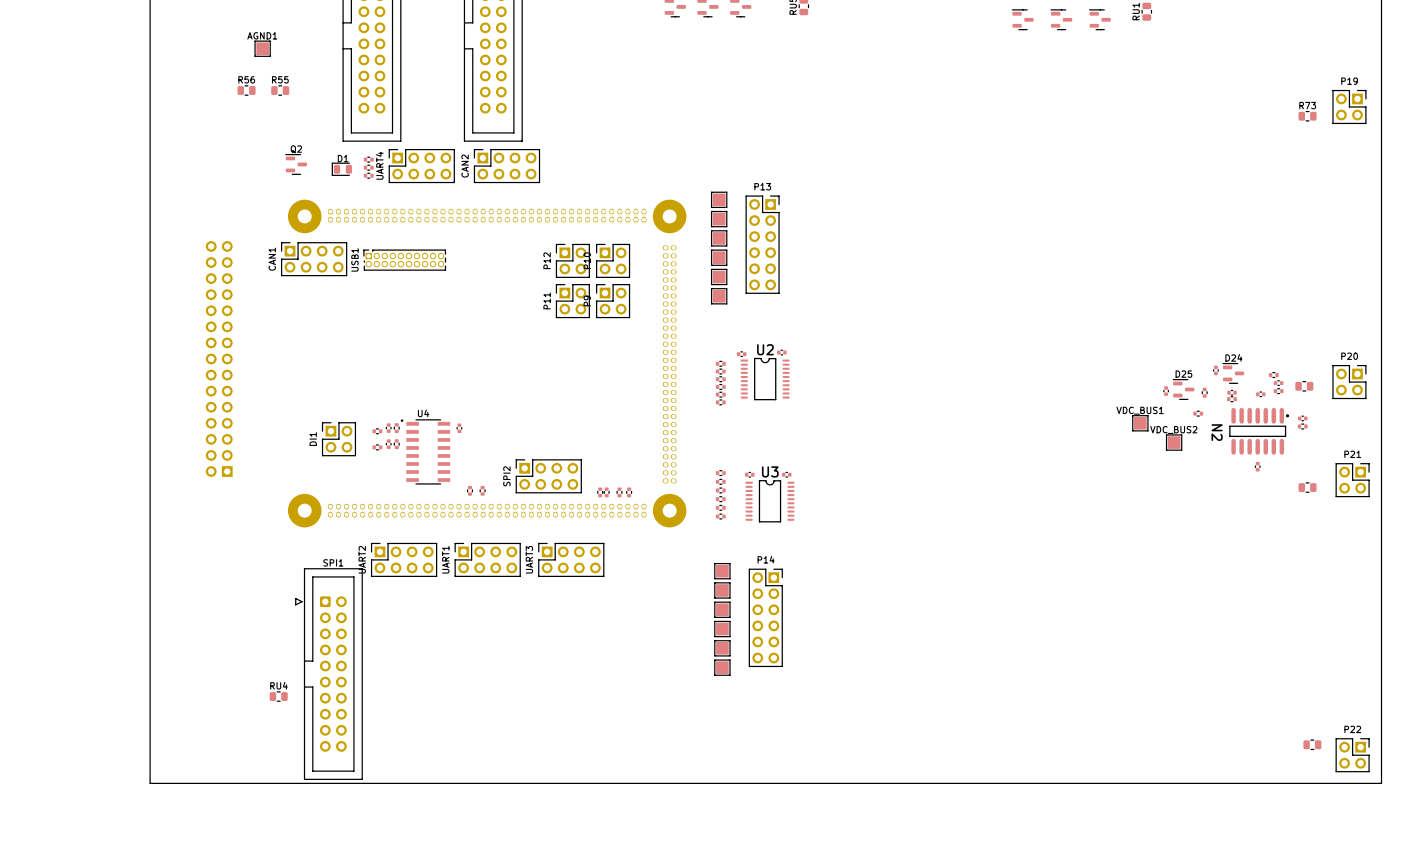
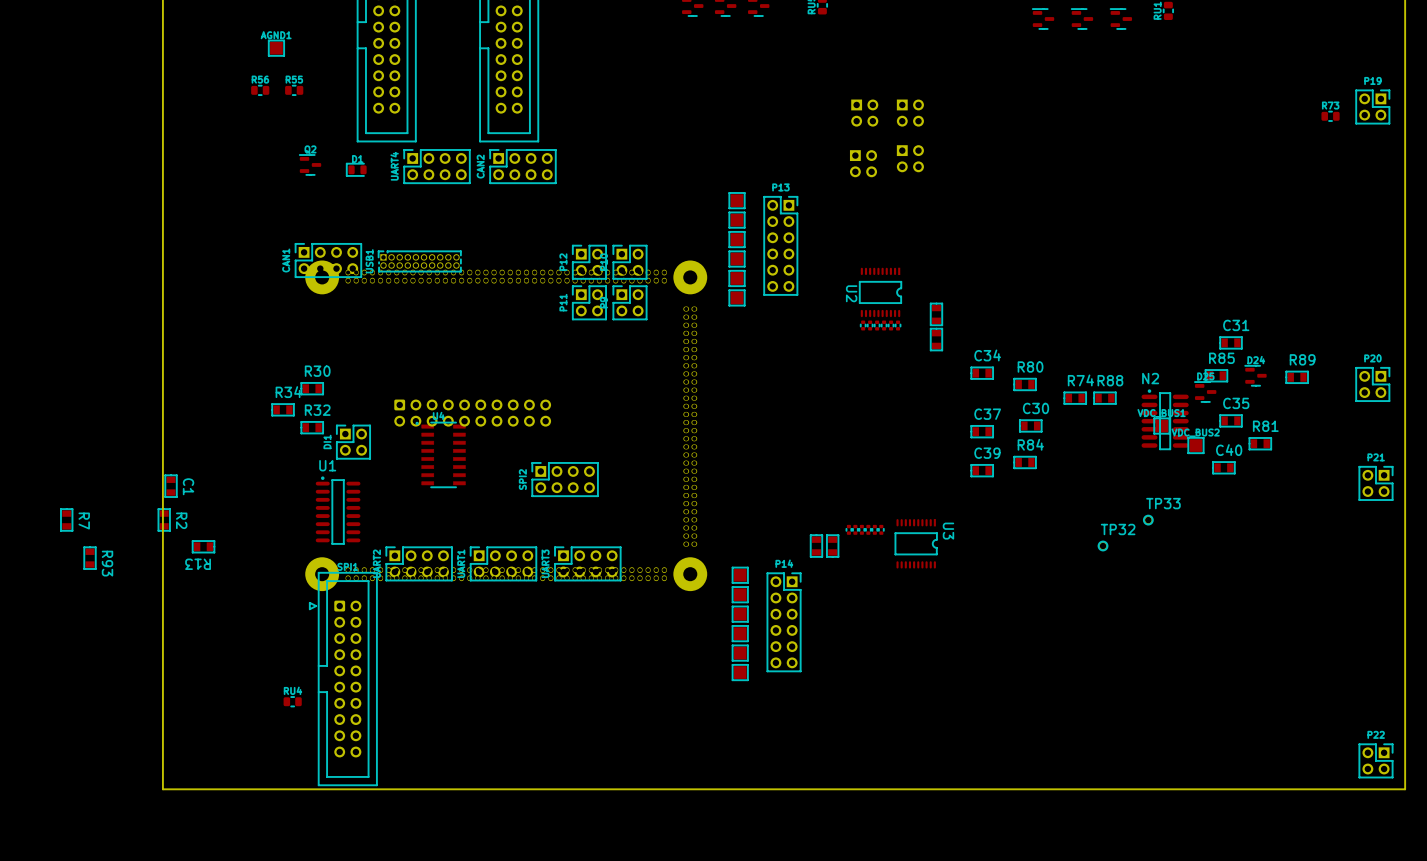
part: none -> (864, 113)
part: none -> (910, 113)
part: none -> (910, 158)
part: (368, 159) -> none
part: none -> (863, 163)
part: (368, 167) -> none
part: (368, 175) -> none
part: none -> (936, 314)
part: none -> (863, 325)
part: none -> (870, 325)
part: none -> (877, 325)
part: none -> (884, 325)
part: none -> (891, 325)
part: none -> (898, 325)
part: none -> (936, 339)
C31: none -> (1231, 342)
U2 name position: U2 (765, 349) -> U2 (851, 293)
part: (781, 352) -> none
part: (741, 354) -> none
part: (219, 358) -> none
part position: (487, 363) -> (506, 425)
part: (720, 363) -> none
C34: none -> (982, 373)
part: (1215, 370) -> none
part: (720, 371) -> none
R85: none -> (1216, 375)
R89: none -> (1297, 377)
part: (1273, 375) -> none
part: (720, 379) -> none
U2 rotation: 0° (765, 379) -> 90° clockwise (880, 292)
U2 position: (765, 379) -> (880, 292)
R80: none -> (1025, 384)
part: (1278, 383) -> none
R30: none -> (312, 388)
part: (720, 386) -> none
part: (1304, 386) -> none
part: (1166, 391) -> none
part: (1278, 391) -> none
part: (1204, 392) -> none
part: (1232, 392) -> none
part: (720, 394) -> none
part: (1260, 394) -> none
R74: none -> (1075, 398)
R88: none -> (1104, 398)
part: (1231, 399) -> none
part: (720, 402) -> none
R34: none -> (283, 409)
part: none -> (472, 413)
part: (1198, 413) -> none
C35: none -> (1231, 420)
part: (1302, 418) -> none
C30: none -> (1030, 425)
R32: none -> (312, 427)
part: (1302, 426) -> none
part: (388, 428) -> none
part: (396, 428) -> none
part: (459, 428) -> none
C37: none -> (982, 431)
part: (377, 431) -> none
N2 rotation: 0° (1259, 431) -> 90° counterclockwise (1165, 419)
N2 position: (1259, 431) -> (1165, 419)
N2 name position: N2 (1217, 432) -> N2 (1150, 378)
R81: none -> (1260, 443)
part: (388, 444) -> none
part: (396, 444) -> none
part: (377, 447) -> none
R84: none -> (1025, 462)
C40: none -> (1223, 467)
part: (1257, 466) -> none
C39: none -> (982, 470)
U3 name position: U3 (770, 471) -> U3 (948, 531)
part: (720, 473) -> none
part: (749, 474) -> none
part: (786, 474) -> none
part: (720, 481) -> none
C1: none -> (171, 486)
part: (1307, 487) -> none
part: (470, 490) -> none
part: (482, 490) -> none
part: (720, 490) -> none
part: (600, 492) -> none
part: (606, 492) -> none
part: (619, 492) -> none
part: (629, 492) -> none
part: (720, 499) -> none
U3 rotation: 0° (770, 501) -> 90° clockwise (916, 543)
U3 position: (770, 501) -> (916, 543)
U1: none -> (338, 510)
part: (720, 507) -> none
R7: none -> (66, 519)
R2: none -> (164, 519)
part: (720, 516) -> none
TP33: none -> (1148, 520)
part: none -> (848, 529)
part: none -> (855, 529)
part: none -> (861, 529)
part: none -> (868, 529)
part: none -> (874, 529)
part: none -> (881, 529)
R13: none -> (203, 546)
part: none -> (816, 546)
part: none -> (832, 546)
TP32: none -> (1103, 546)
R93: none -> (90, 558)
part: (1312, 744) -> none

